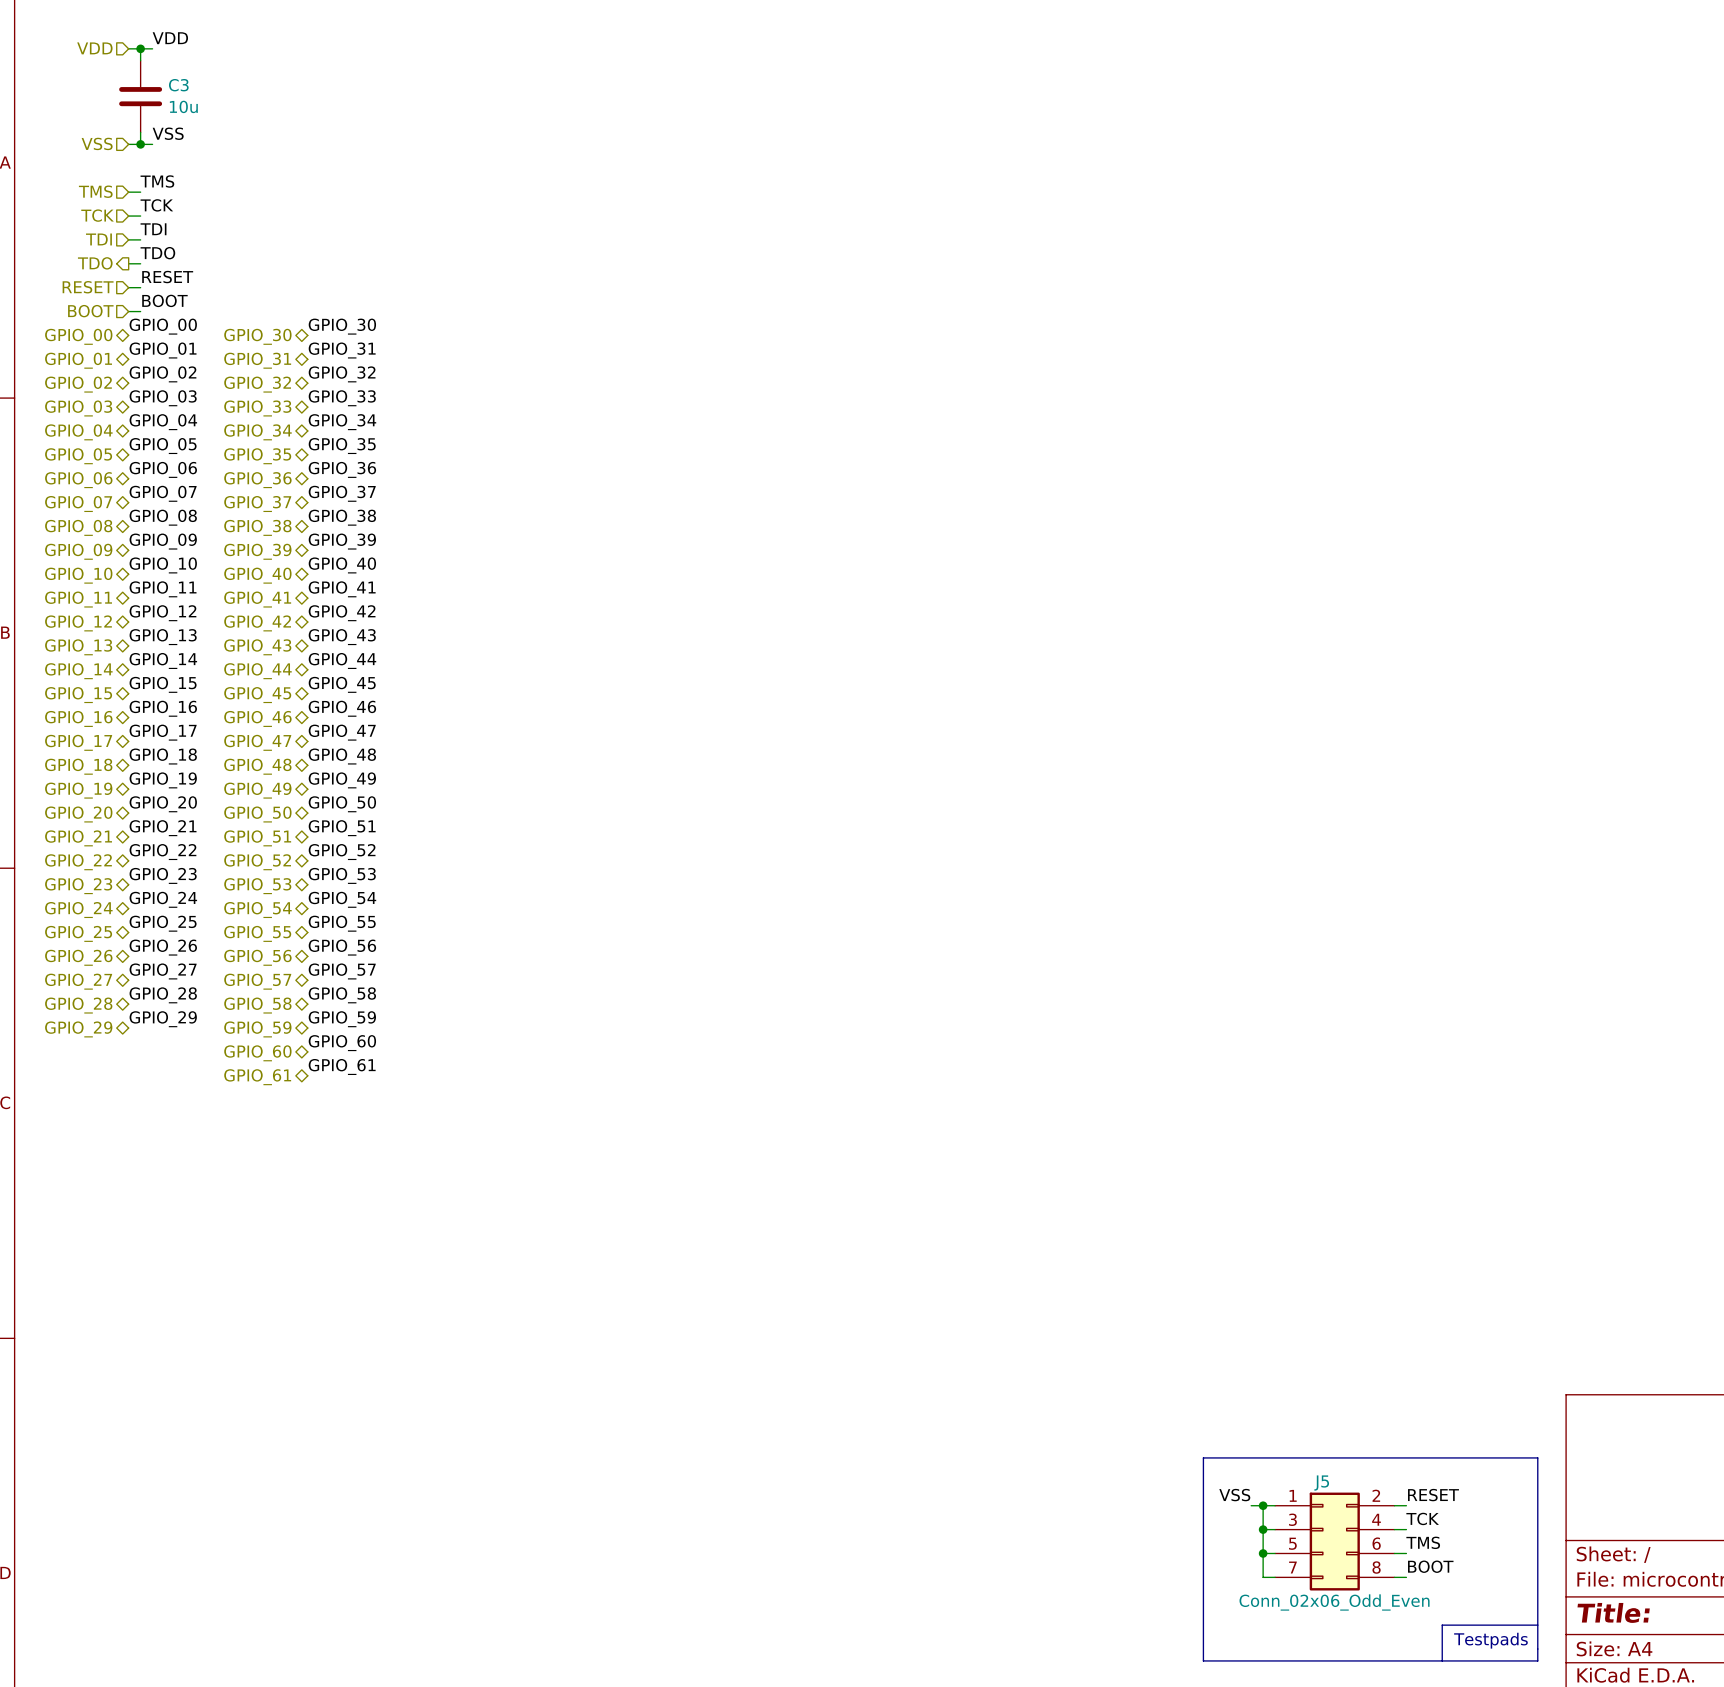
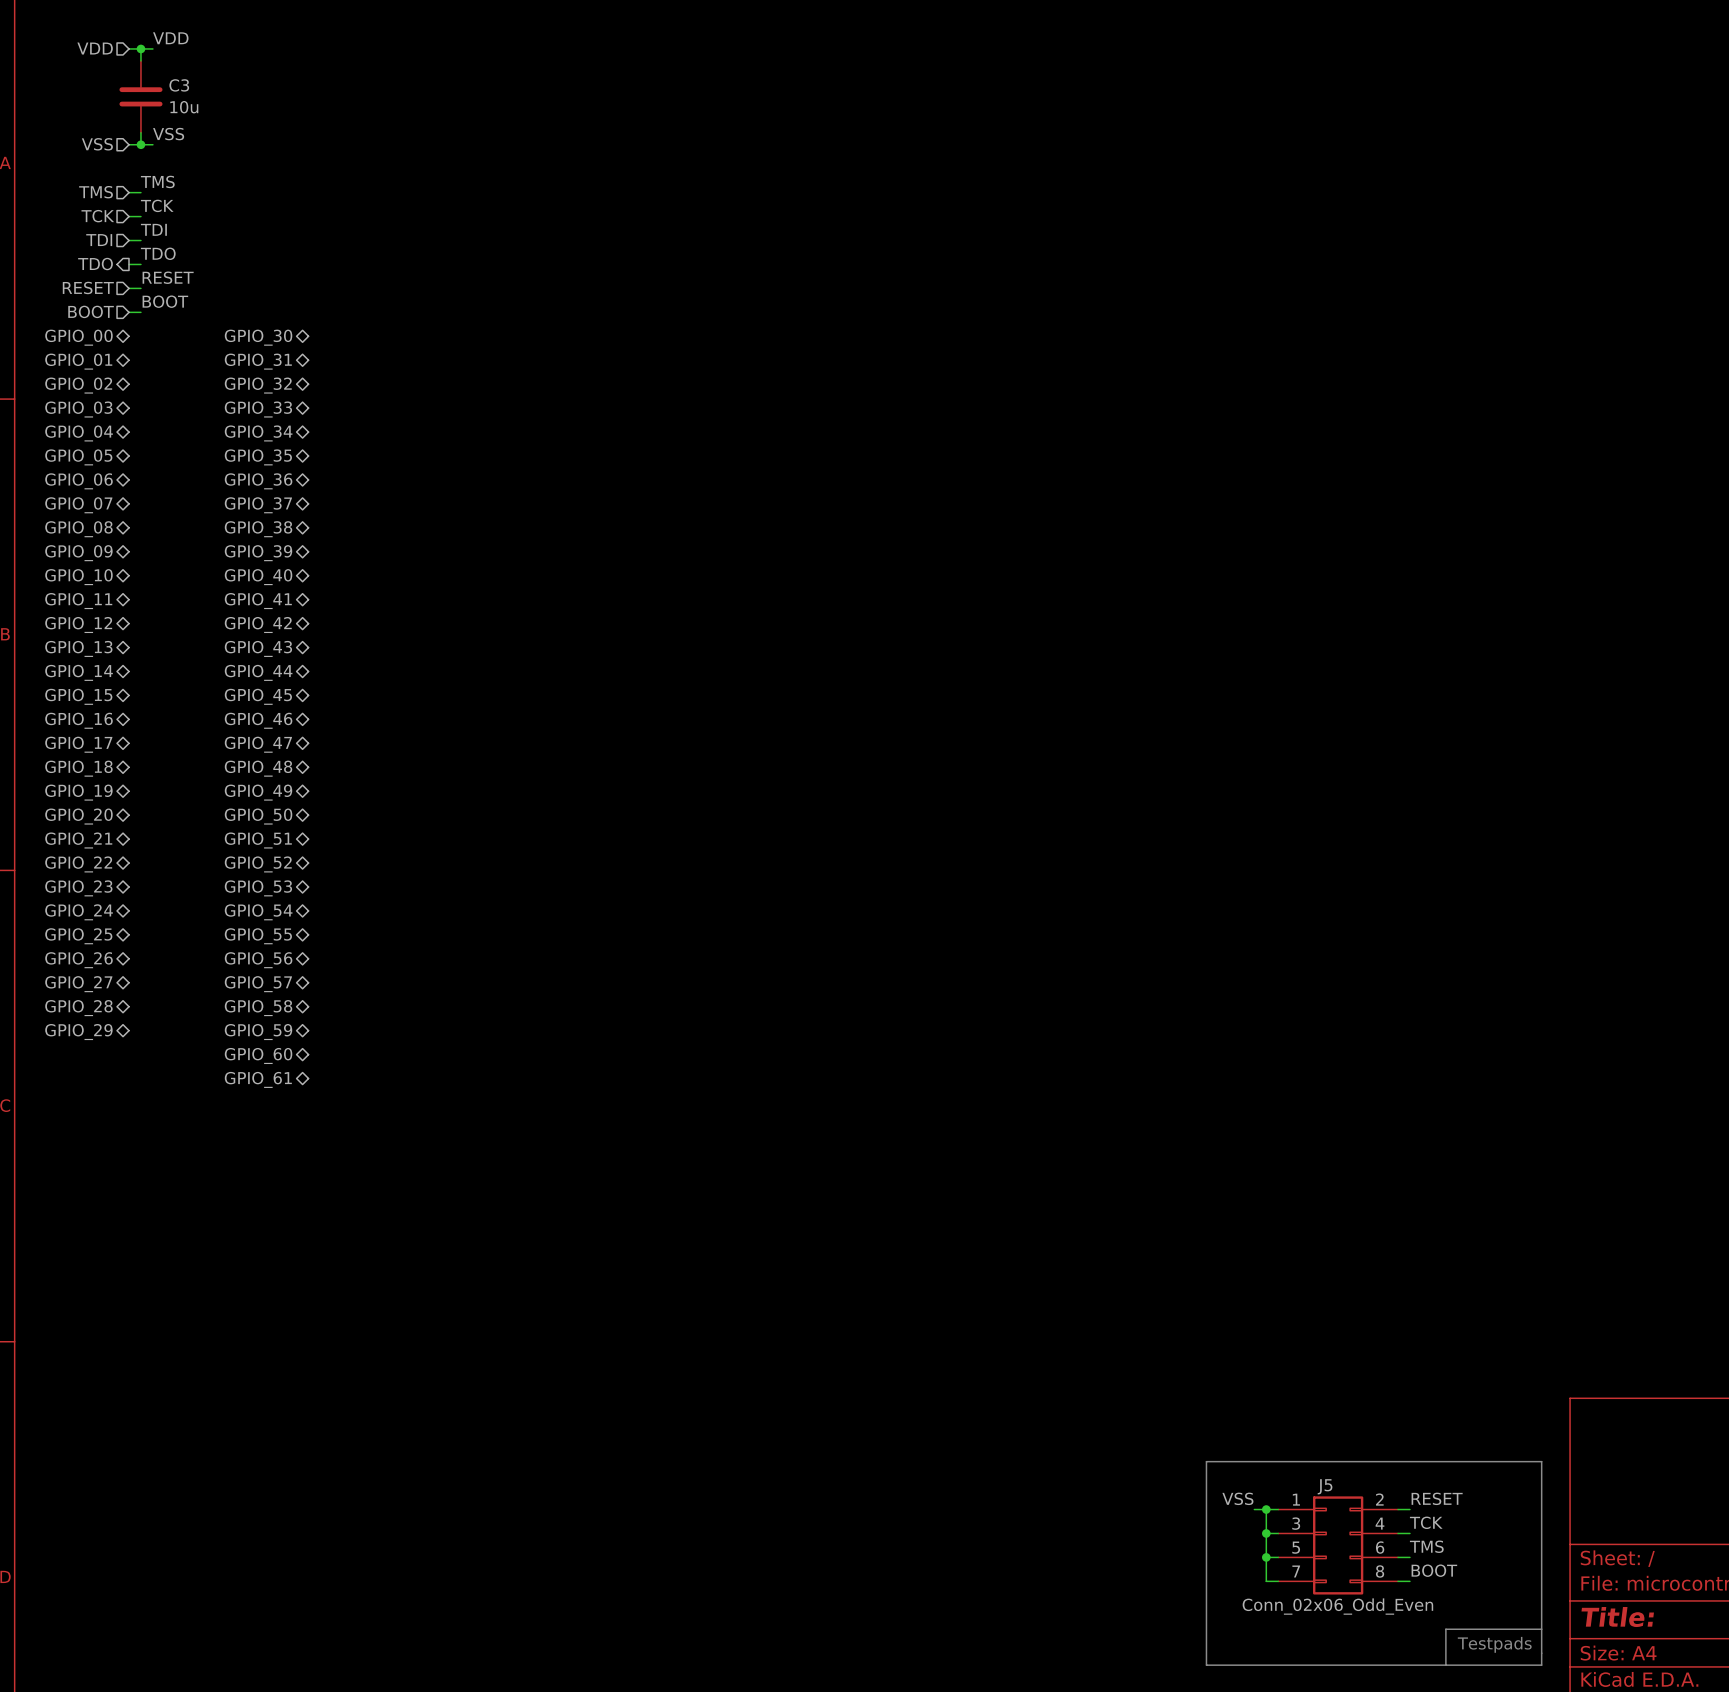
label: GPIO_00 (163, 326) -> none
label: GPIO_30 (342, 326) -> none
label: GPIO_01 (163, 350) -> none
label: GPIO_31 (342, 350) -> none
label: GPIO_02 (162, 374) -> none
label: GPIO_32 (342, 374) -> none
label: GPIO_03 (163, 398) -> none
label: GPIO_33 (342, 398) -> none
label: GPIO_04 (163, 422) -> none
label: GPIO_34 (342, 422) -> none
label: GPIO_05 (163, 446) -> none
label: GPIO_35 (342, 446) -> none
label: GPIO_06 (163, 469) -> none
label: GPIO_36 (342, 469) -> none
label: GPIO_07 (163, 493) -> none
label: GPIO_37 (342, 493) -> none
label: GPIO_08 (163, 517) -> none
label: GPIO_38 (342, 517) -> none
label: GPIO_09 (163, 541) -> none
label: GPIO_39 (342, 541) -> none
label: GPIO_10 (163, 565) -> none
label: GPIO_40 (342, 565) -> none
label: GPIO_11 (163, 589) -> none
label: GPIO_41 (342, 589) -> none
label: GPIO_12 (162, 613) -> none
label: GPIO_42 (342, 613) -> none
label: GPIO_13 (163, 637) -> none
label: GPIO_43 (342, 637) -> none
label: GPIO_14 (163, 660) -> none
label: GPIO_44 (342, 660) -> none
label: GPIO_15 (163, 684) -> none
label: GPIO_45 (342, 684) -> none
label: GPIO_16 (163, 708) -> none
label: GPIO_46 (342, 708) -> none
label: GPIO_17 (163, 732) -> none
label: GPIO_47 (342, 732) -> none
label: GPIO_18 (163, 756) -> none
label: GPIO_48 (342, 756) -> none
label: GPIO_19 (163, 780) -> none
label: GPIO_49 (342, 780) -> none
label: GPIO_20 (163, 804) -> none
label: GPIO_50 (342, 804) -> none
label: GPIO_21 (163, 828) -> none
label: GPIO_51 (342, 828) -> none
label: GPIO_22 (162, 852) -> none
label: GPIO_52 (342, 852) -> none
label: GPIO_23 (163, 875) -> none
label: GPIO_53 (342, 875) -> none
label: GPIO_24 (163, 899) -> none
label: GPIO_54 (342, 899) -> none
label: GPIO_25 (163, 923) -> none
label: GPIO_55 (342, 923) -> none
label: GPIO_26 (163, 947) -> none
label: GPIO_56 (342, 947) -> none
label: GPIO_27 (163, 971) -> none
label: GPIO_57 (342, 971) -> none
label: GPIO_28 (163, 995) -> none
label: GPIO_58 (342, 995) -> none
label: GPIO_29 (163, 1019) -> none
label: GPIO_59 (342, 1019) -> none
label: GPIO_60 (342, 1043) -> none
label: GPIO_61 (342, 1066) -> none

